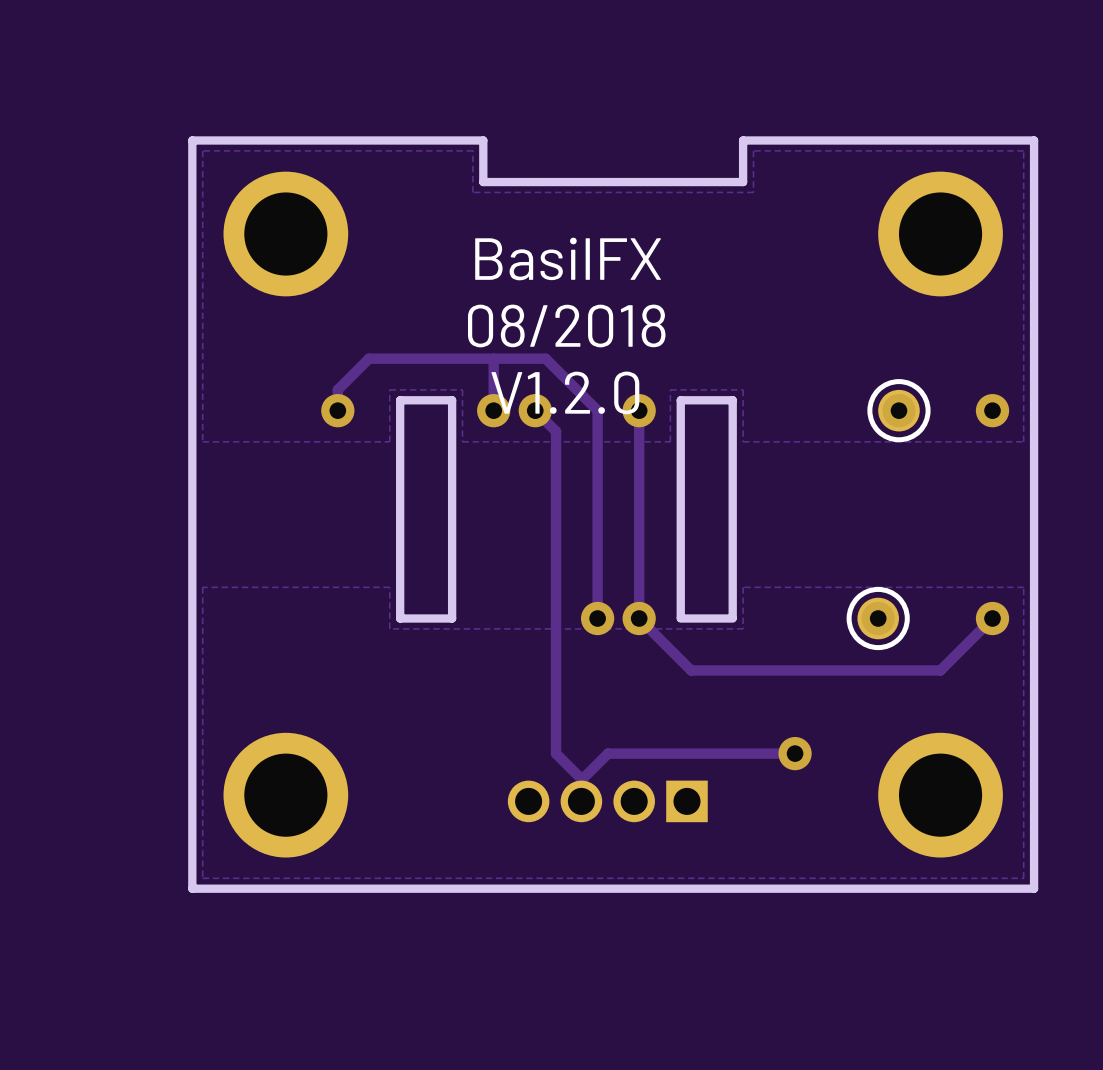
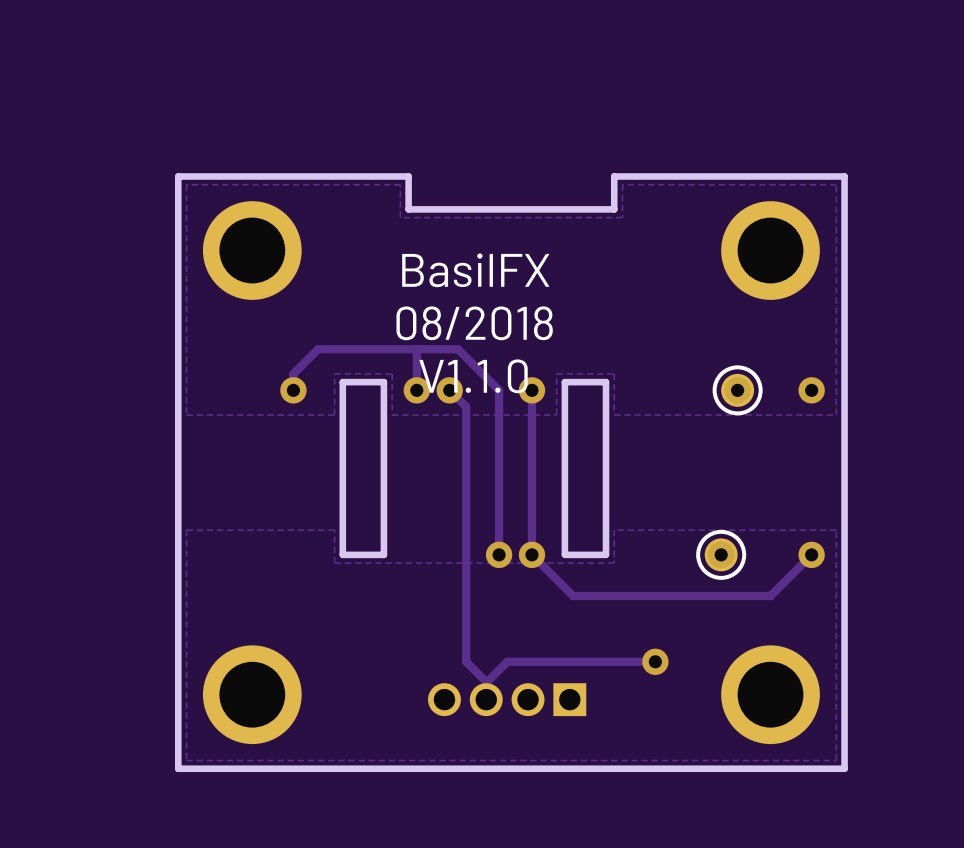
text: V1.2.0 (565, 392) -> V1.1.0 (473, 376)

